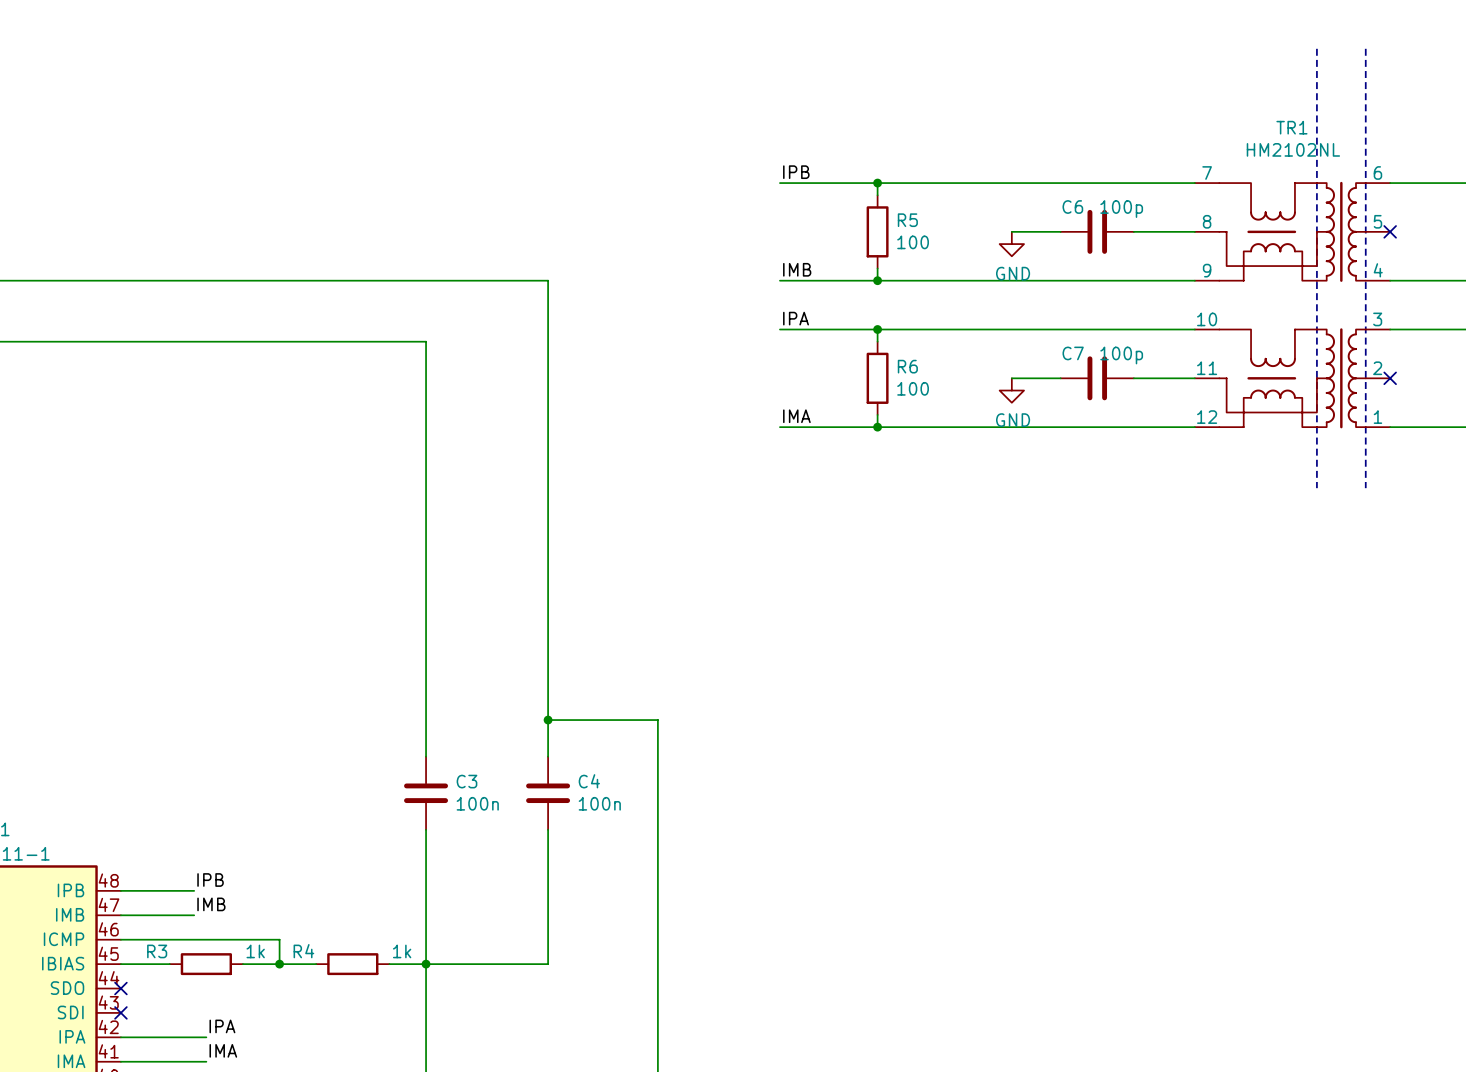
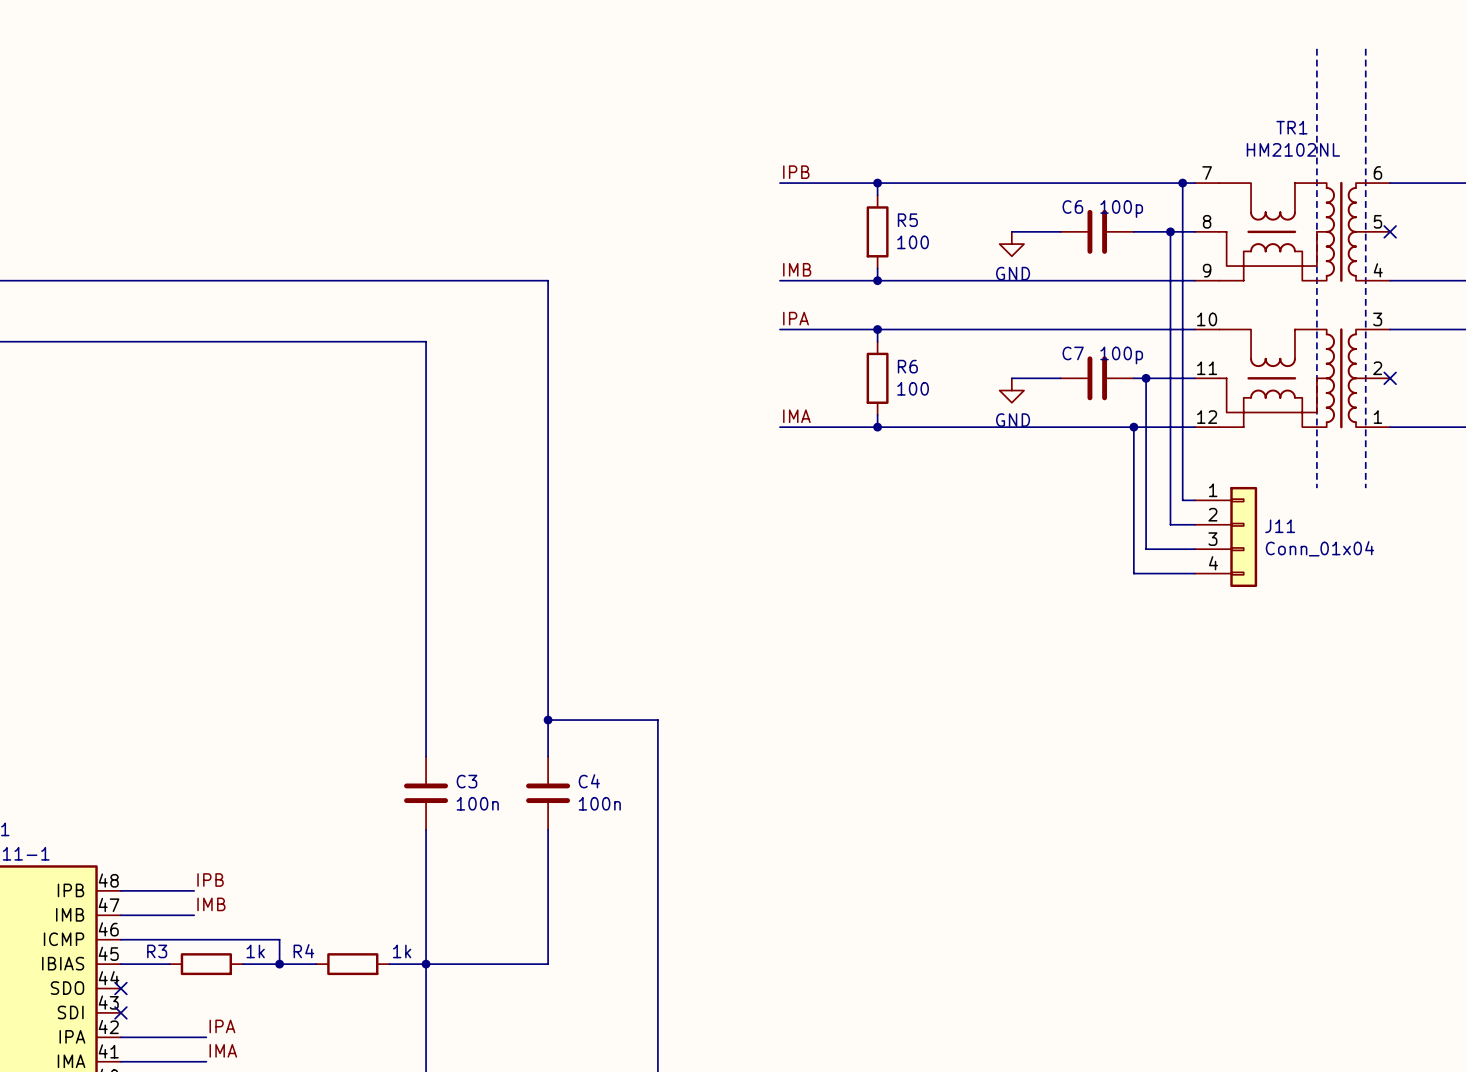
wire: none -> (1182, 183) (1182, 500) (1194, 500)
junction: none -> (1182, 183)
wire: none -> (1170, 231) (1170, 524) (1194, 524)
junction: none -> (1170, 231)
wire: none -> (1146, 378) (1146, 549) (1194, 549)
junction: none -> (1146, 378)
wire: none -> (1133, 427) (1133, 573) (1194, 573)
junction: none -> (1133, 427)
J11: none -> Conn_01x04 (1226, 536)

